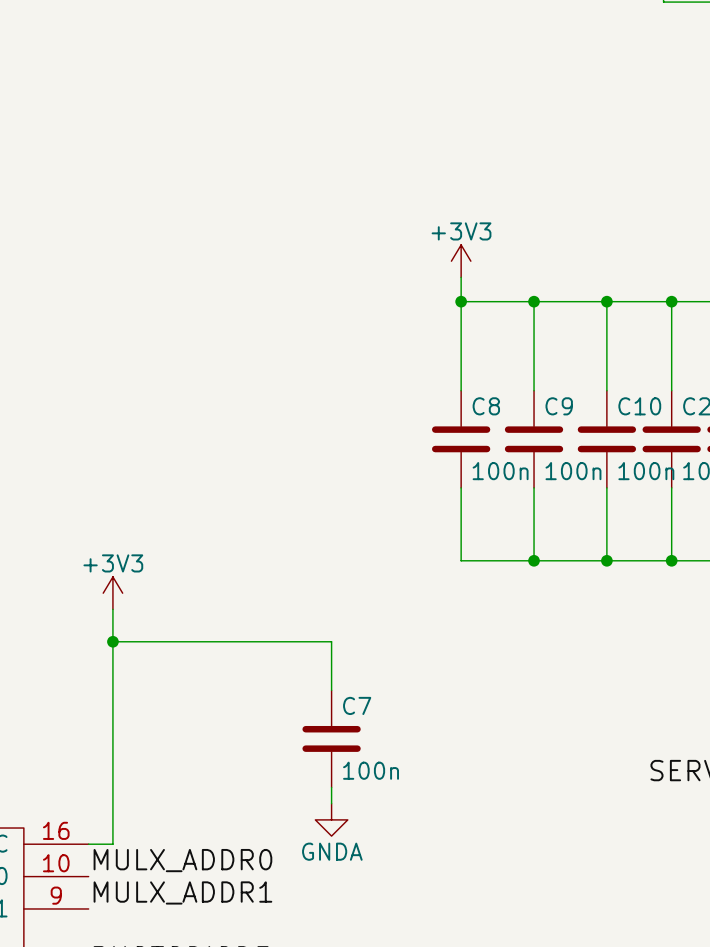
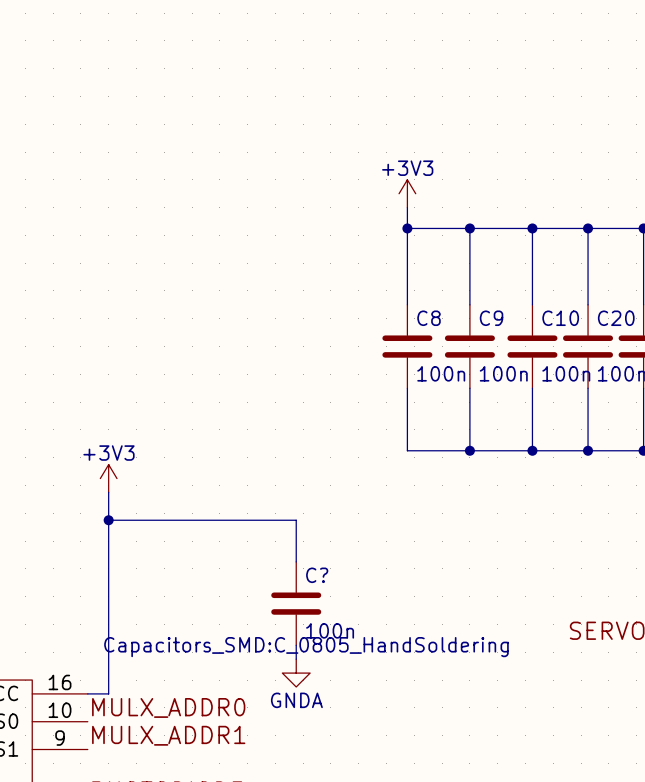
C7 name: C7 (357, 705) -> C? (317, 575)
C7 text: none -> Capacitors_SMD:C_0805_HandSoldering (306, 647)

